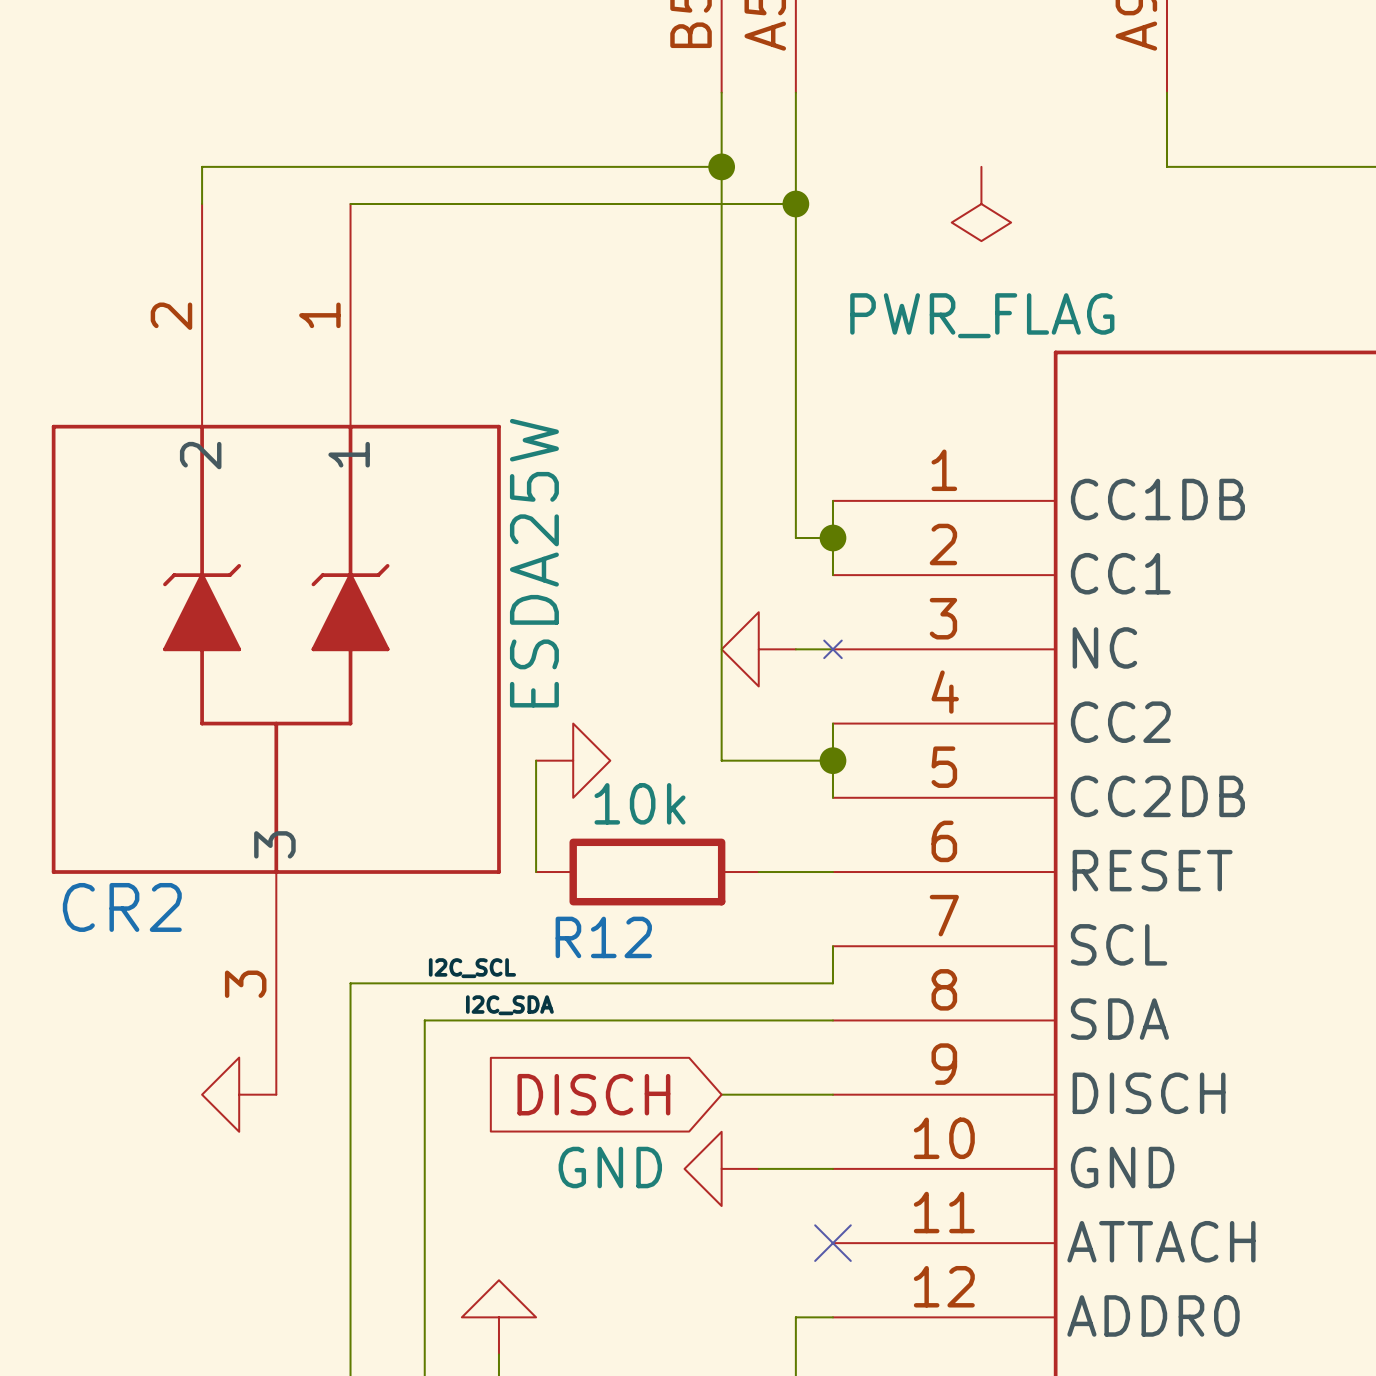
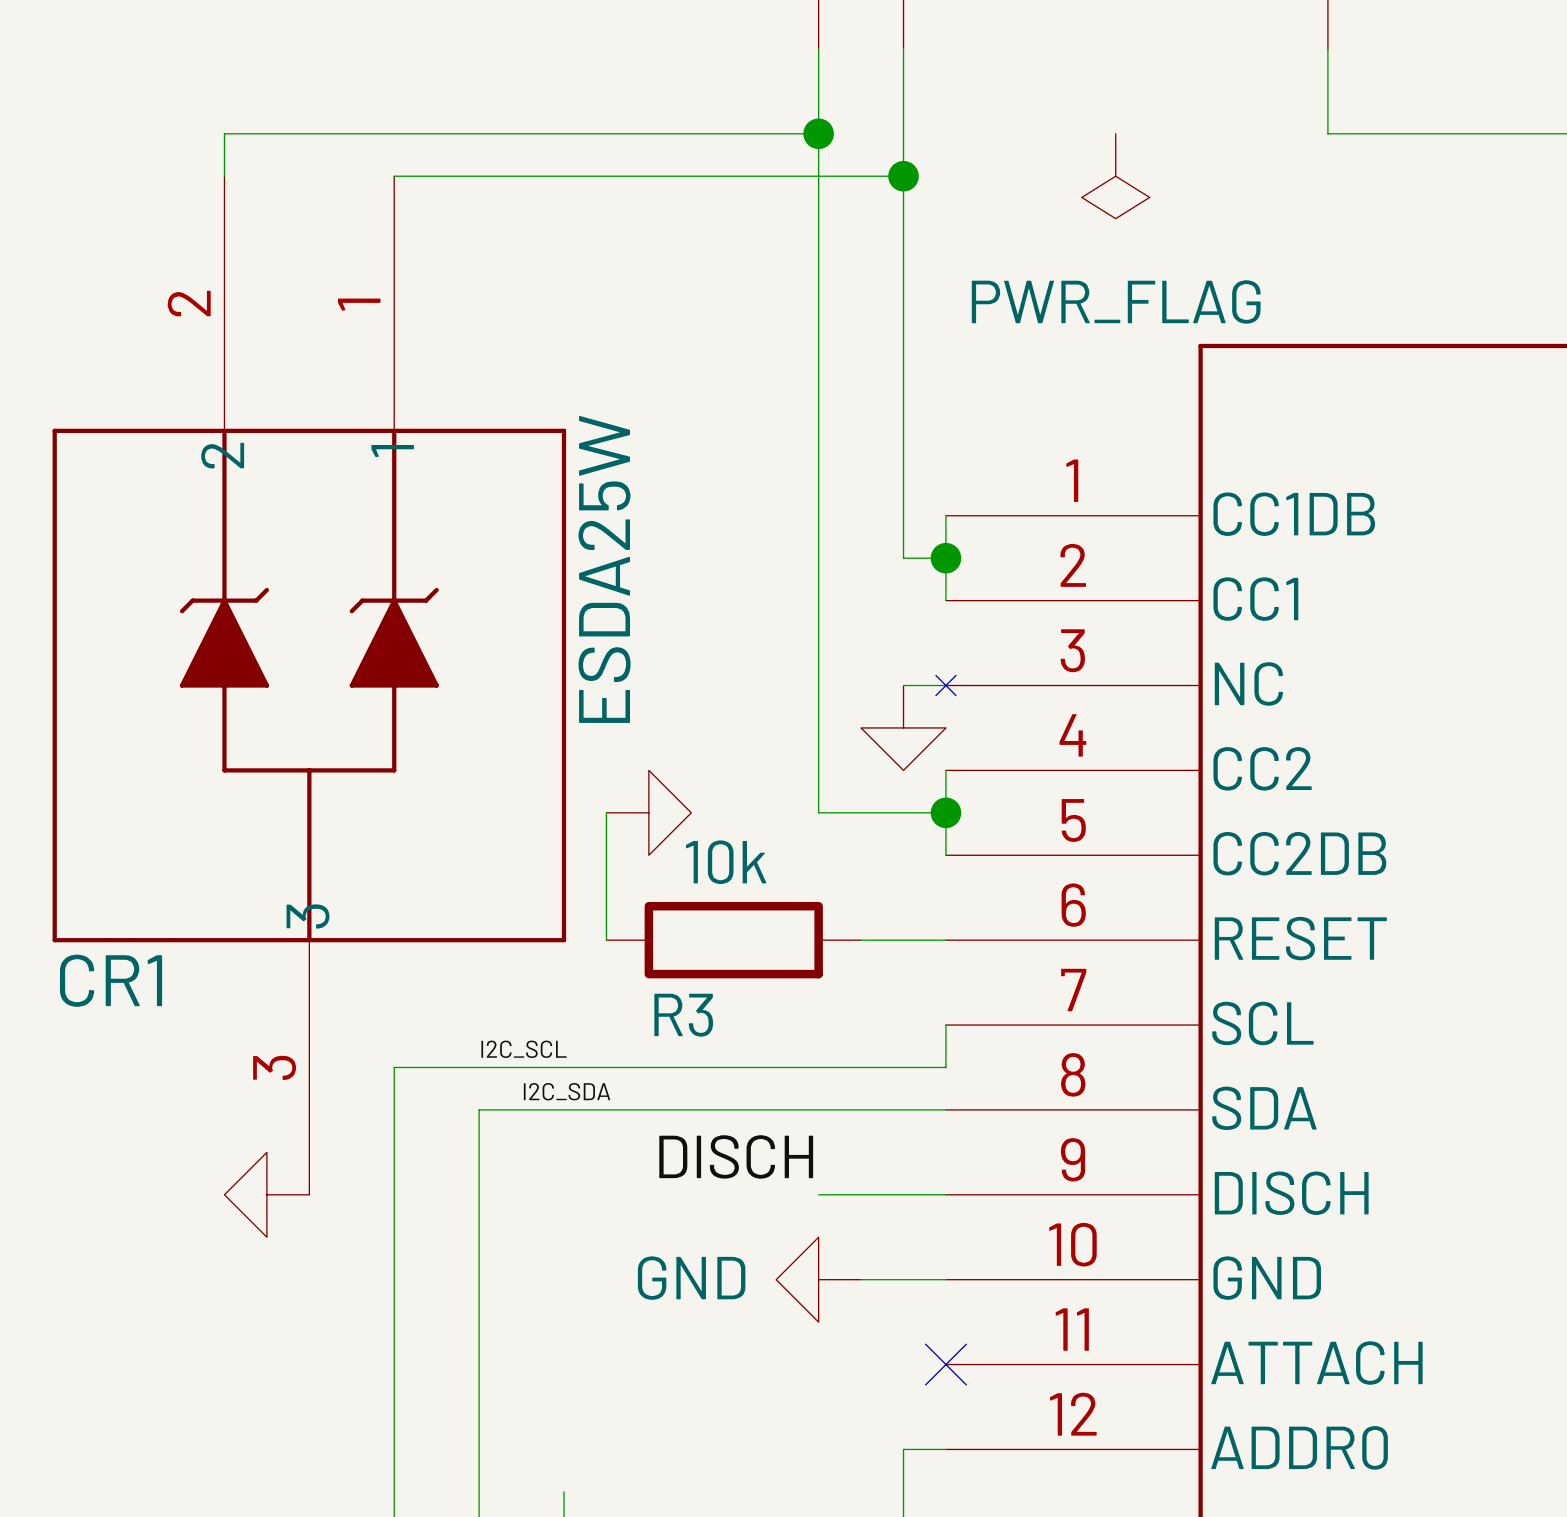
power symbol rotation: 0° (758, 649) -> 90° counterclockwise (903, 727)
power symbol position: (758, 649) -> (903, 727)
CR2 name: CR2 (122, 907) -> CR1 (111, 980)
R12 name: R12 (603, 937) -> R3 (683, 1015)
label: none -> DISCH (736, 1156)
global label: DISCH (593, 1094) -> none
power symbol: (498, 1317) -> none

